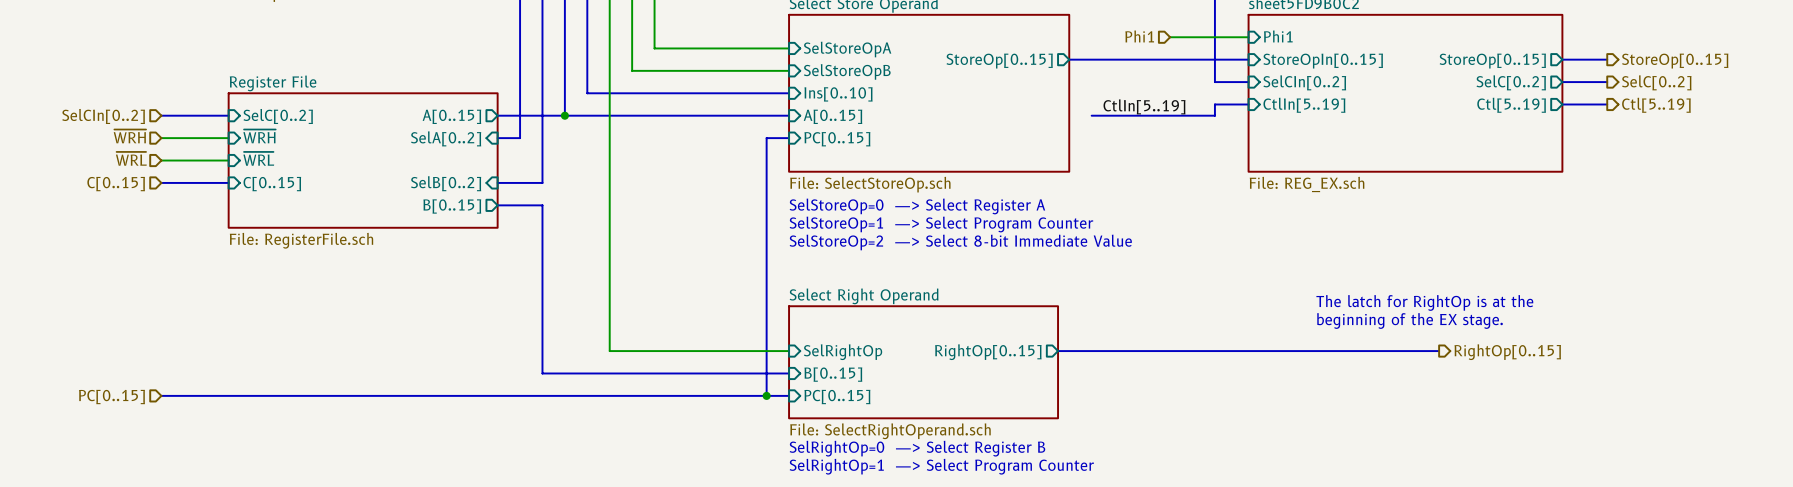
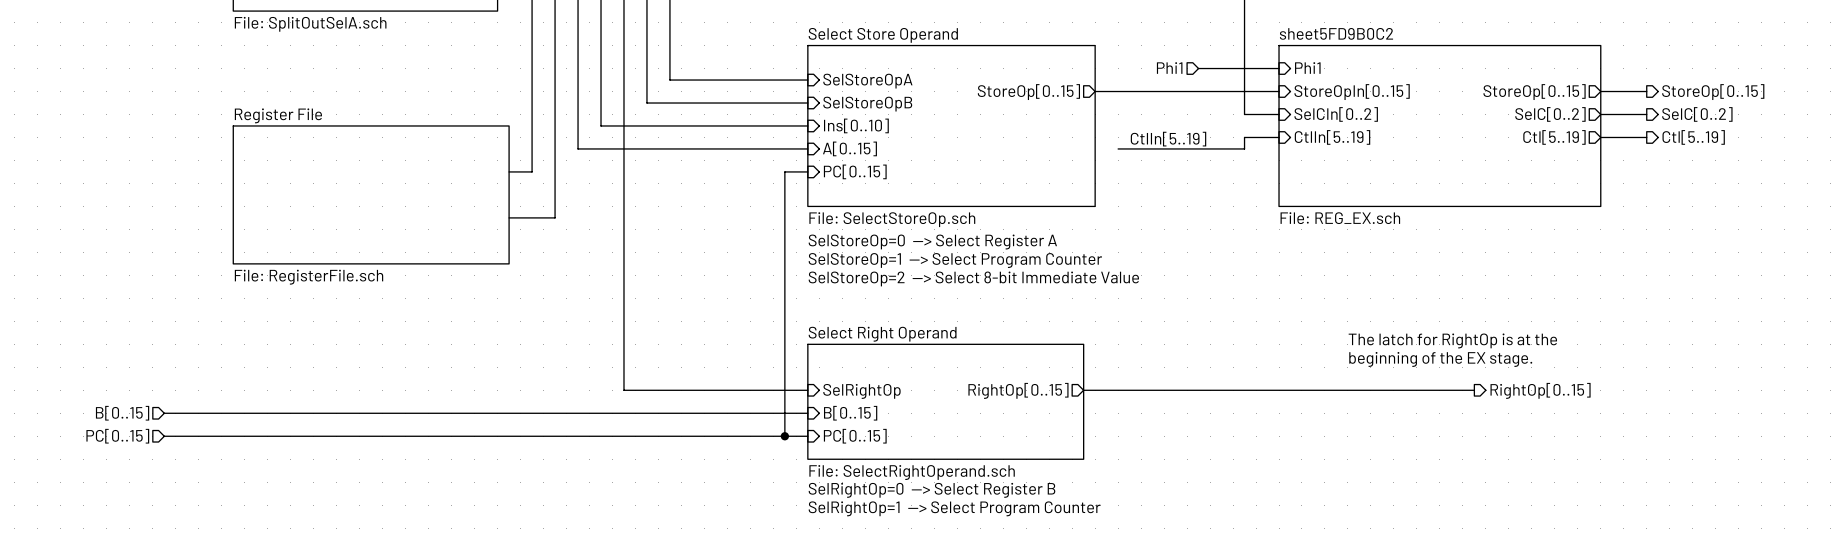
bus: (161, 115) (228, 115) -> none
bus: (497, 115) (564, 115) -> none
junction: (564, 115) -> none
hierarchical label: SelCIn[0..2] (103, 116) -> none
sheet pin: SelC[0..2] (278, 116) -> none
sheet pin: A[0..15] (451, 116) -> none
hierarchical label: ~{WRH} (129, 136) -> none
sheet pin: ~{WRH} (259, 136) -> none
wire: (161, 138) (228, 138) -> none
sheet pin: SelA[0..2] (446, 138) -> none
hierarchical label: ~{WRL} (131, 158) -> none
sheet pin: ~{WRL} (258, 158) -> none
wire: (161, 160) (228, 160) -> none
bus: (161, 182) (228, 182) -> none
sheet pin: SelB[0..2] (446, 183) -> none
hierarchical label: C[0..15] (116, 184) -> none
sheet pin: C[0..15] (272, 184) -> none
bus: (497, 205) (542, 205) (542, 373) -> (164, 413) (555, 413)
sheet pin: B[0..15] (452, 206) -> none
hierarchical label: none -> B[0..15] (122, 413)

